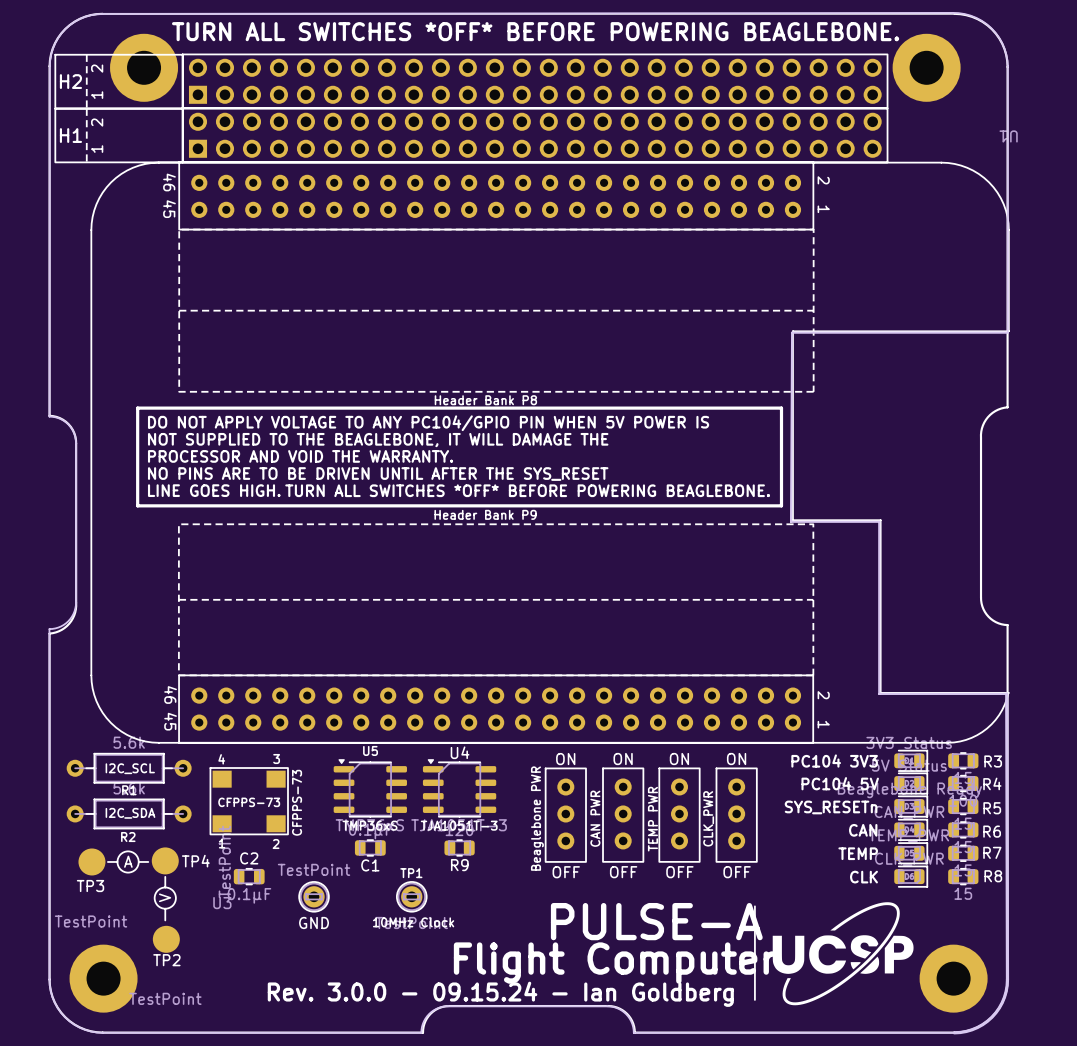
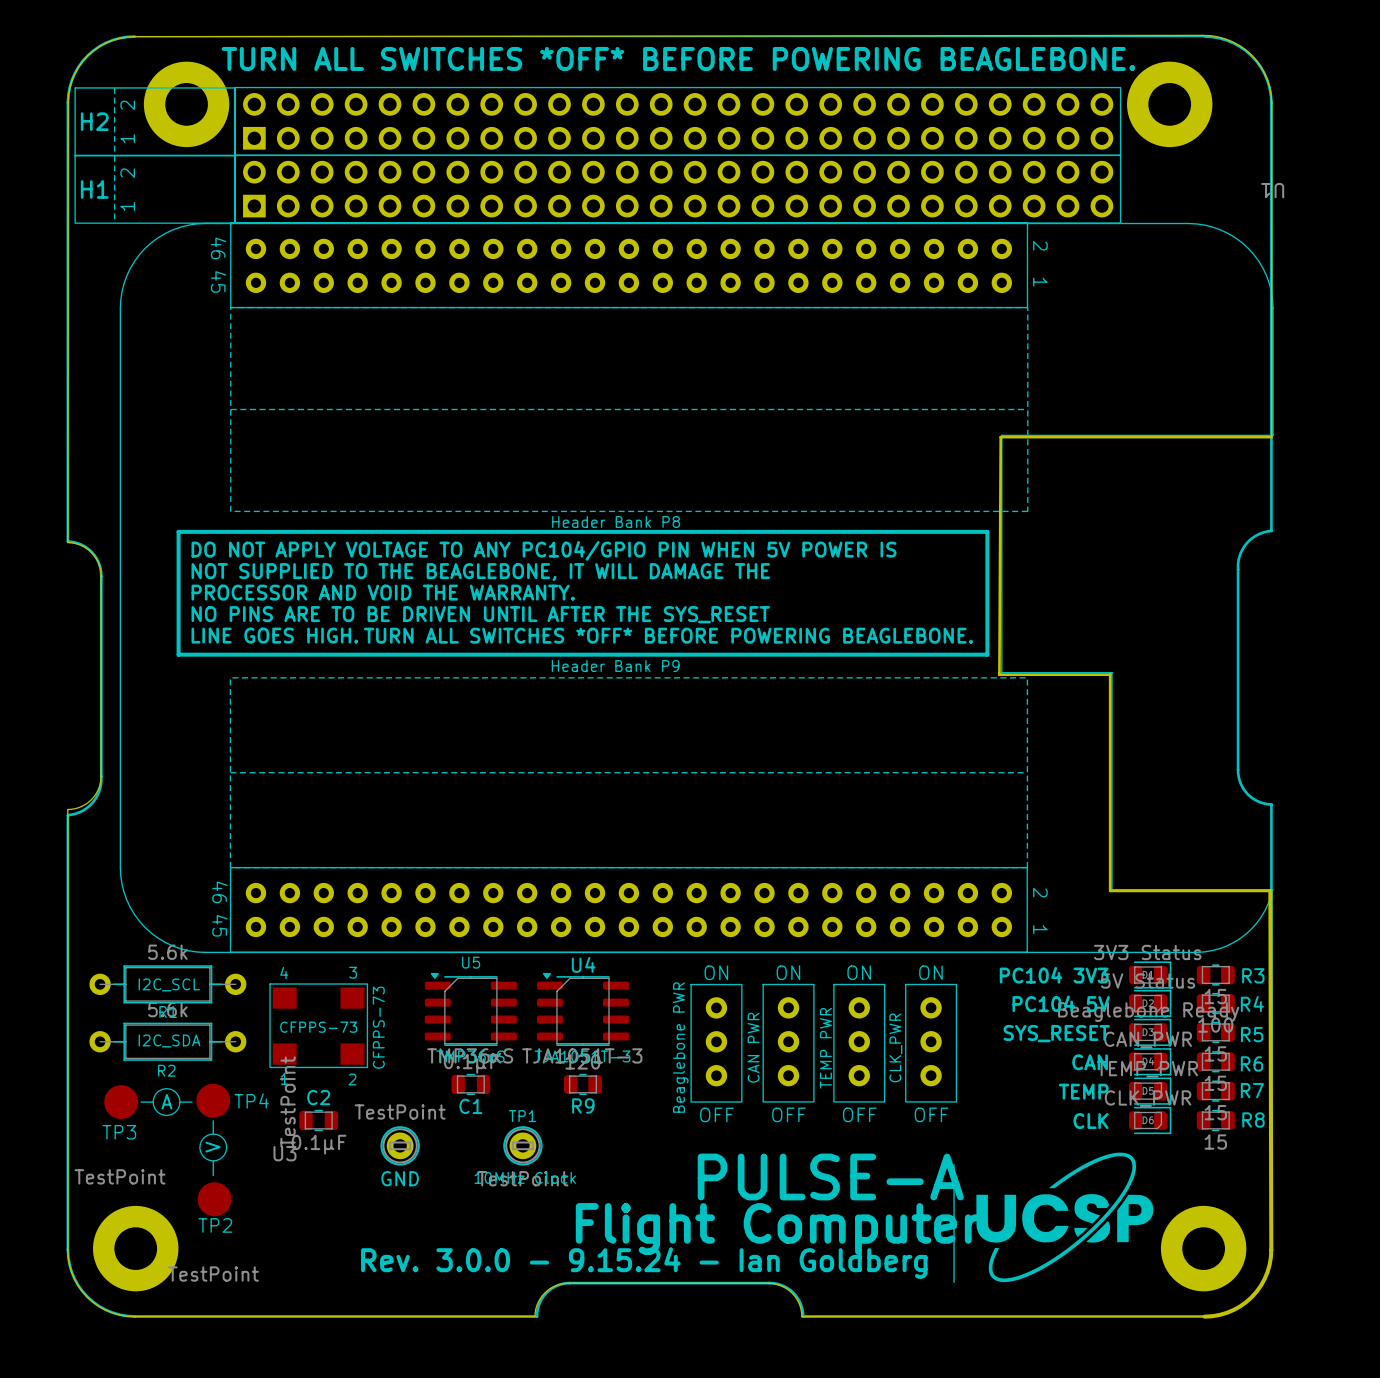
text: SYS_RESETn (831, 807) -> SYS_RESET (1056, 1033)
line: (754, 906) (754, 911) -> (954, 1275) (954, 1282)
text: Rev. 3.0.0 - 09.15.24 - Ian Goldberg (500, 994) -> Rev. 3.0.0 - 9.15.24 - Ian Goldberg (644, 1263)

